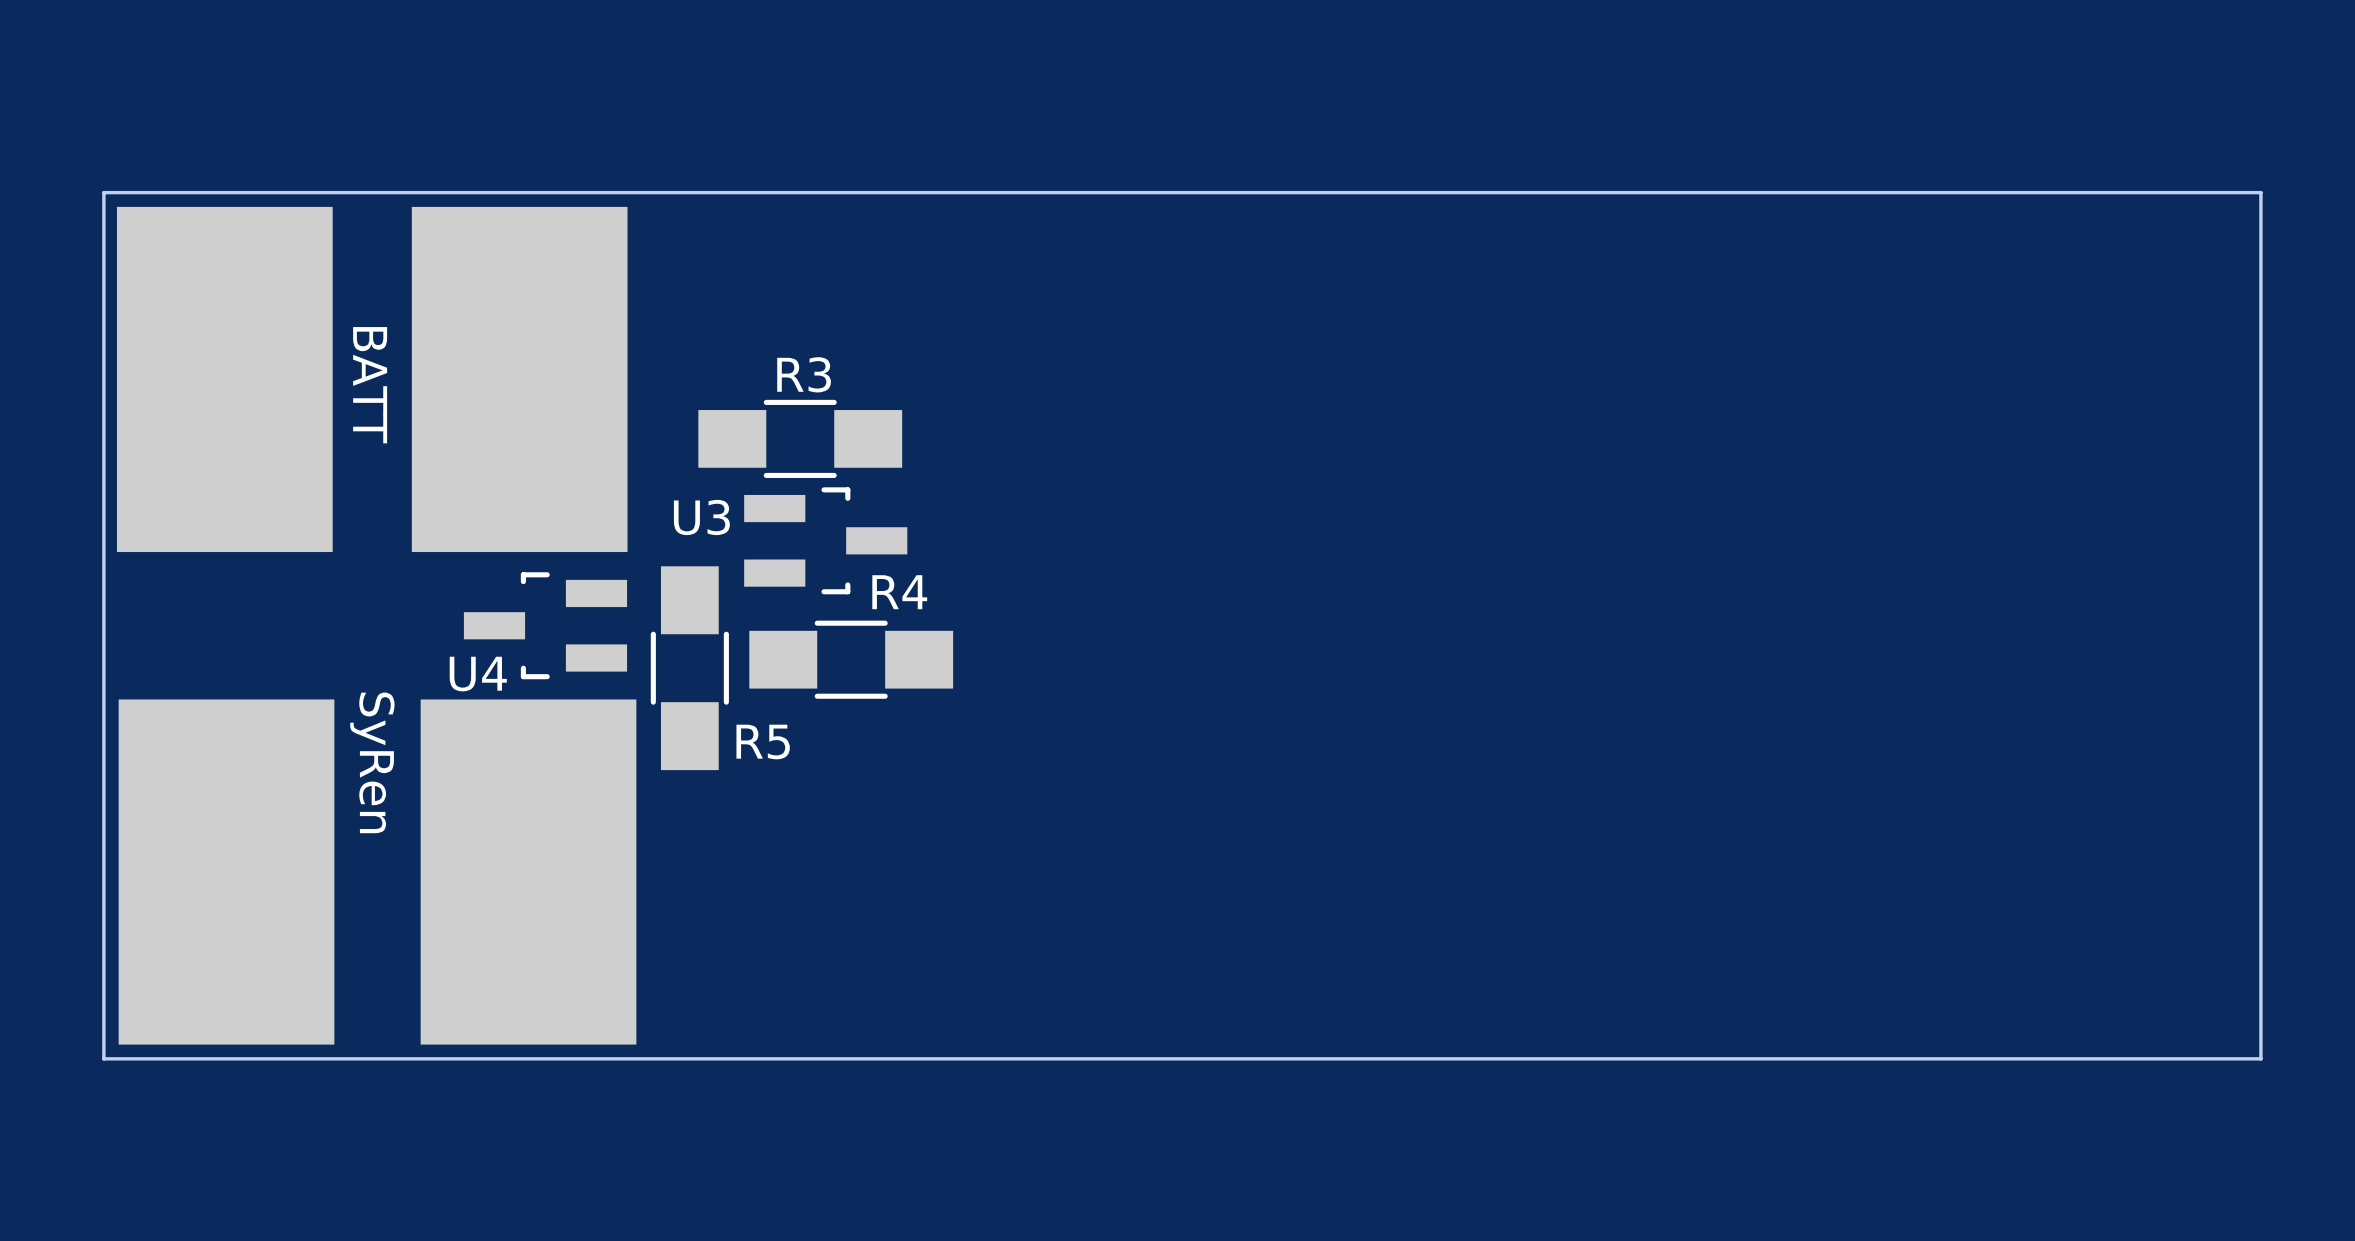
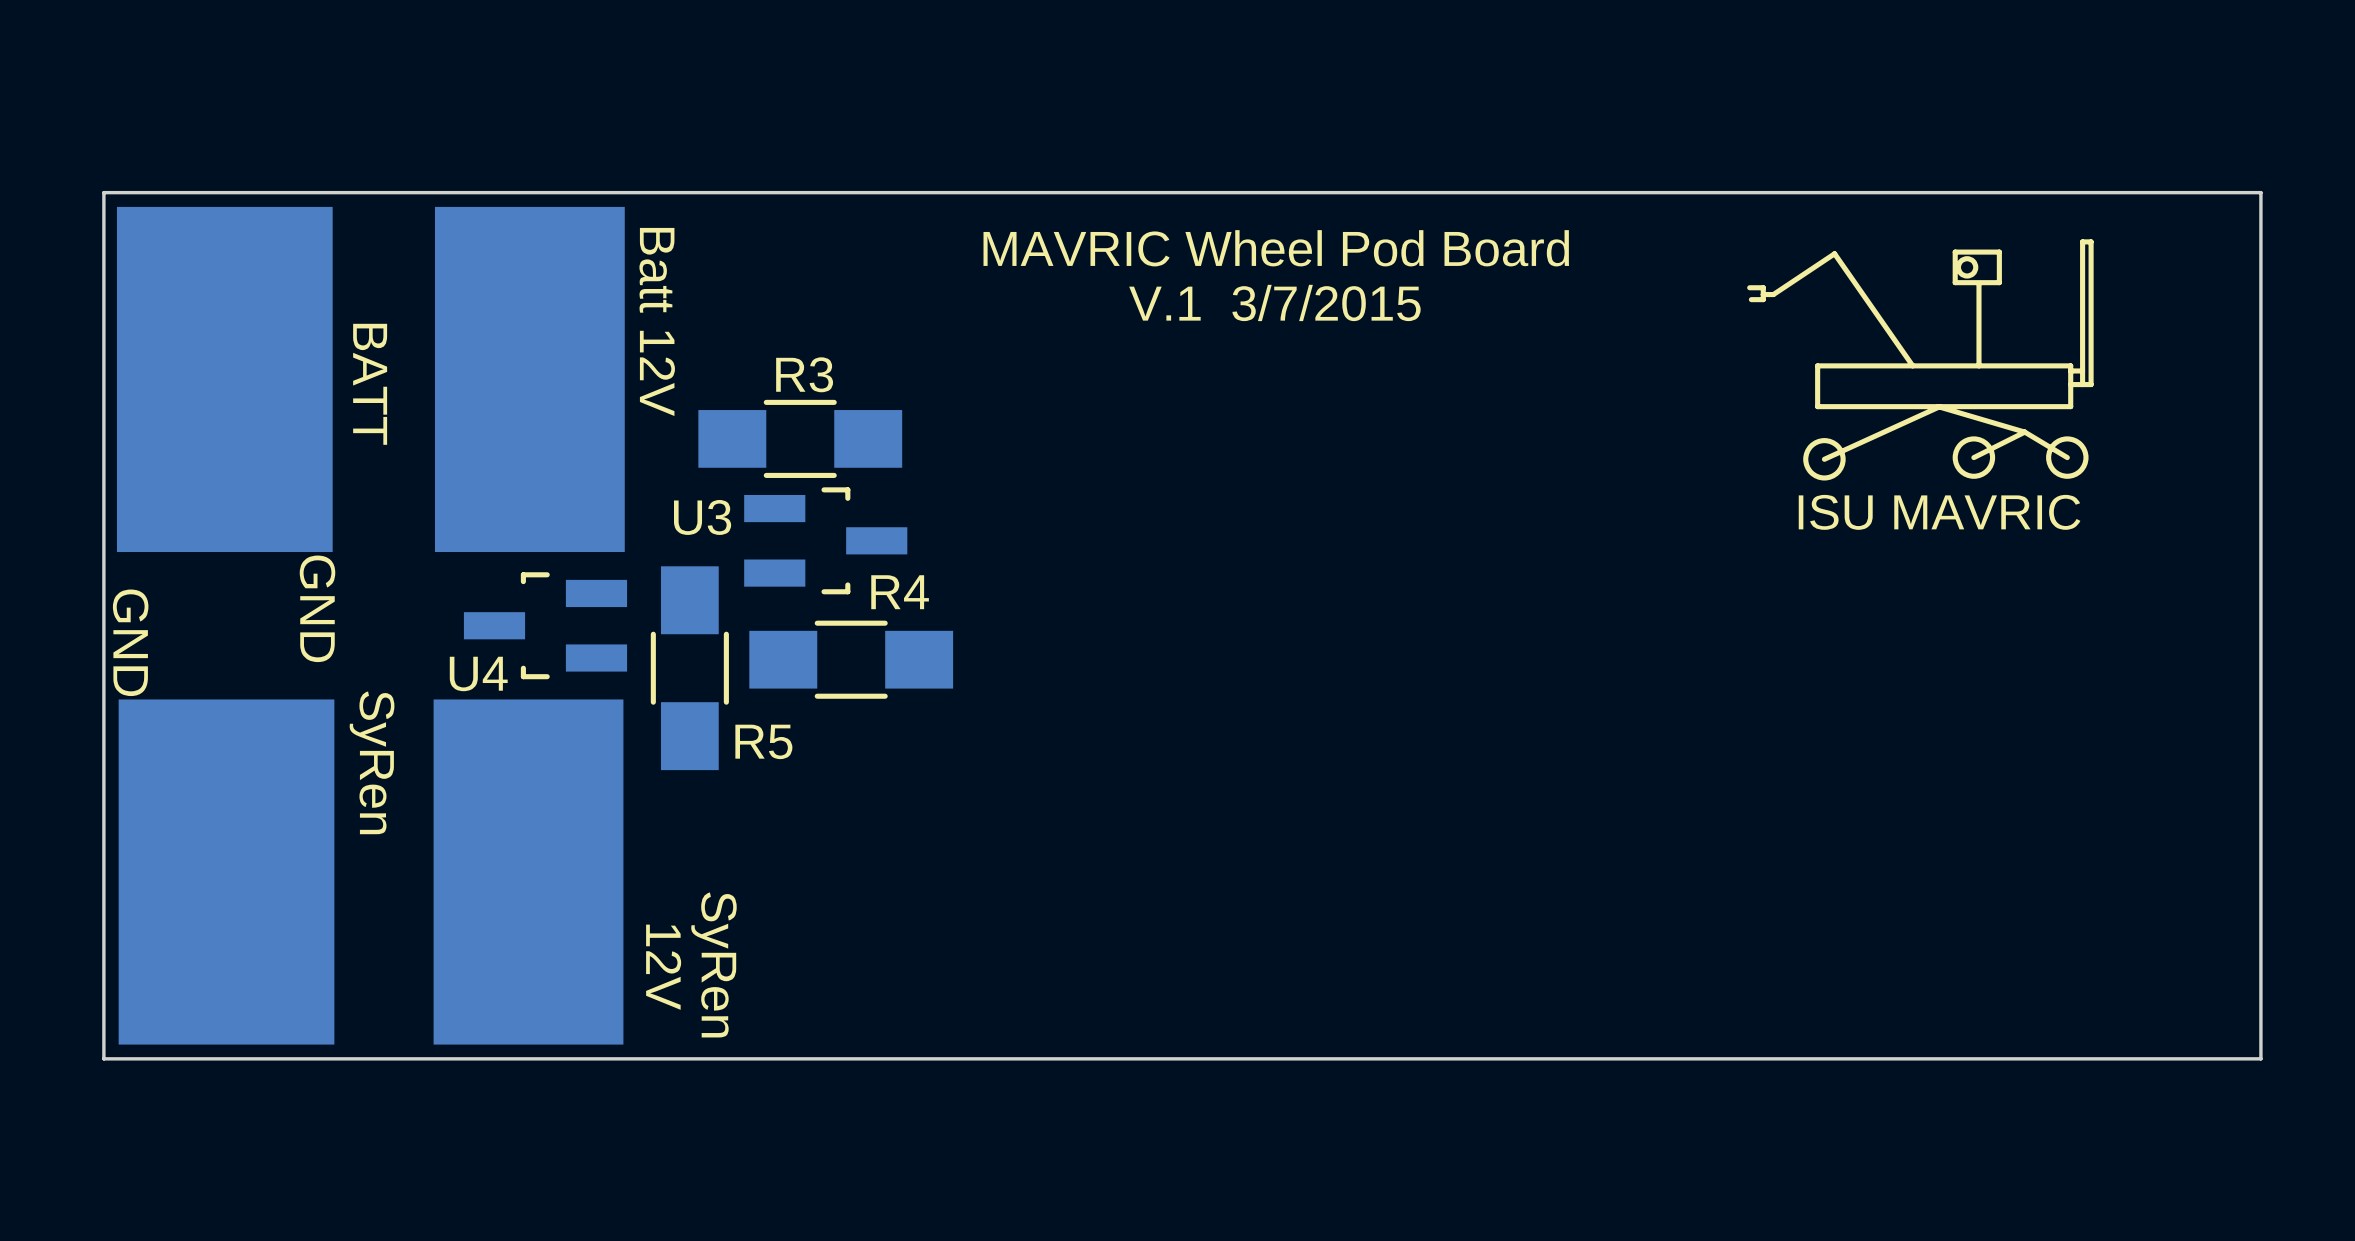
part footprint: [116, 206, 628, 553] -> [116, 206, 625, 553]
text: none -> MAVRIC Wheel Pod Board (1276, 248)
text: none -> V.1 3/7/2015 (1274, 302)
text: none -> Batt 12V (657, 321)
ISU MAVRIC: none -> (1920, 359)
text: none -> GND (317, 608)
text: none -> GND (130, 642)
part footprint: [118, 699, 637, 1045] -> [118, 699, 624, 1045]
text: none -> SyRen (713, 964)
text: none -> 12V (663, 967)

